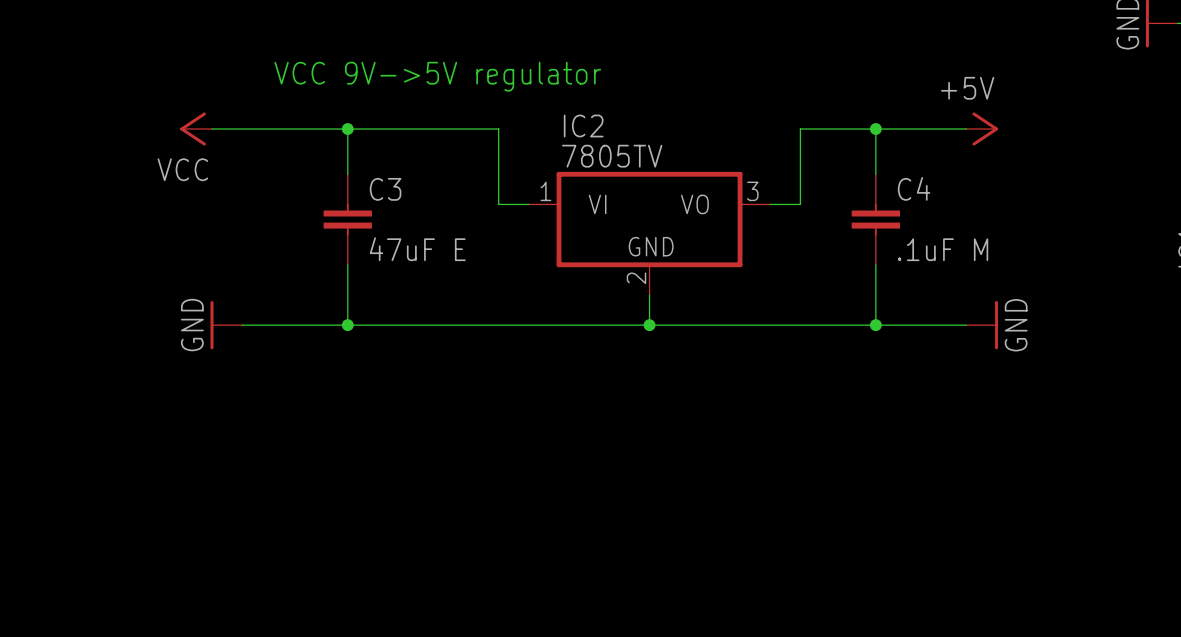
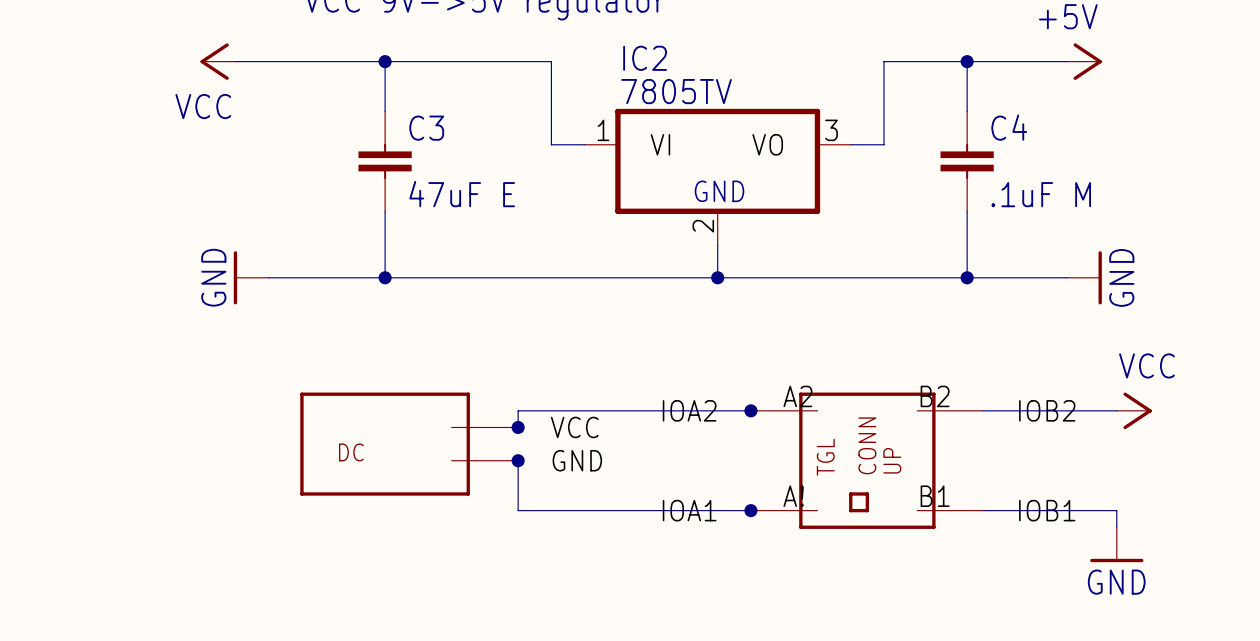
wire: none -> (750, 410) (518, 410) (518, 427)
junction: none -> (750, 410)
wire: none -> (983, 410) (1116, 410)
power symbol: none -> VCC (1134, 410)
junction: none -> (518, 427)
part: none -> (409, 444)
wire: none -> (518, 460) (518, 510) (750, 510)
junction: none -> (518, 460)
part: none -> (867, 460)
junction: none -> (750, 510)
wire: none -> (983, 510) (1116, 510) (1116, 527)
power symbol: none -> GND (1116, 544)

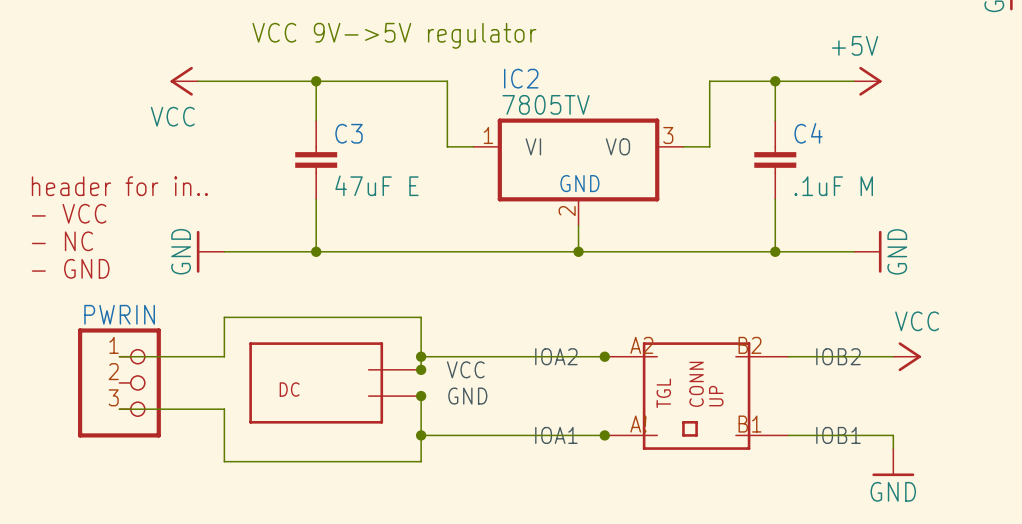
text: none -> header for in.. (119, 186)
text: none -> - VCC (69, 213)
text: none -> - NC (62, 241)
text: none -> - GND (70, 268)
wire: none -> (119, 356) (224, 356) (224, 317) (421, 317) (421, 356)
junction: none -> (421, 356)
PWRIN: none -> (119, 382)
wire: none -> (119, 409) (224, 409) (224, 461) (421, 461) (421, 435)
junction: none -> (421, 435)

